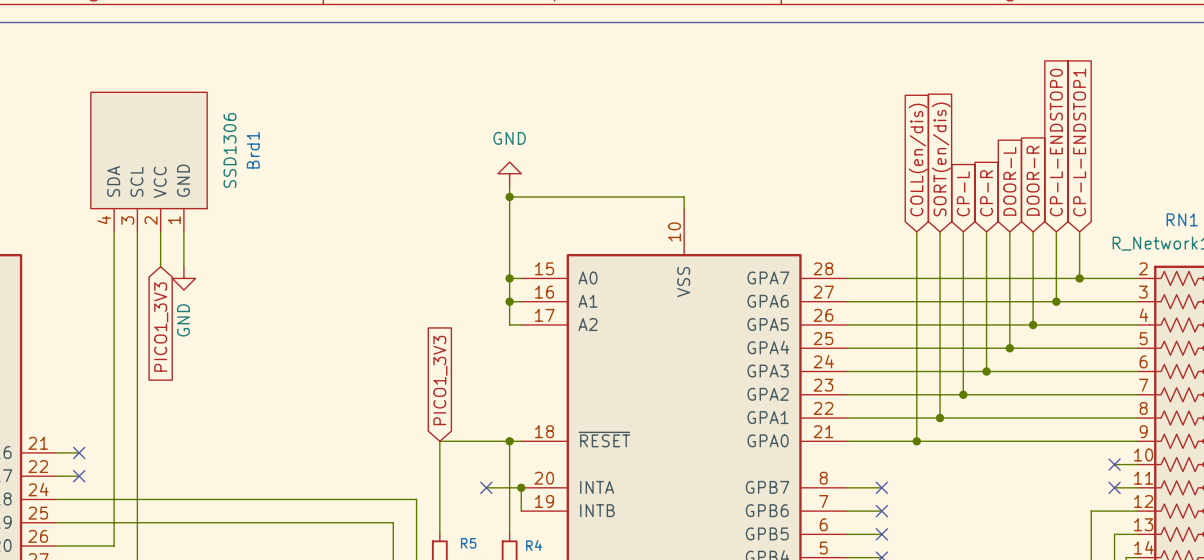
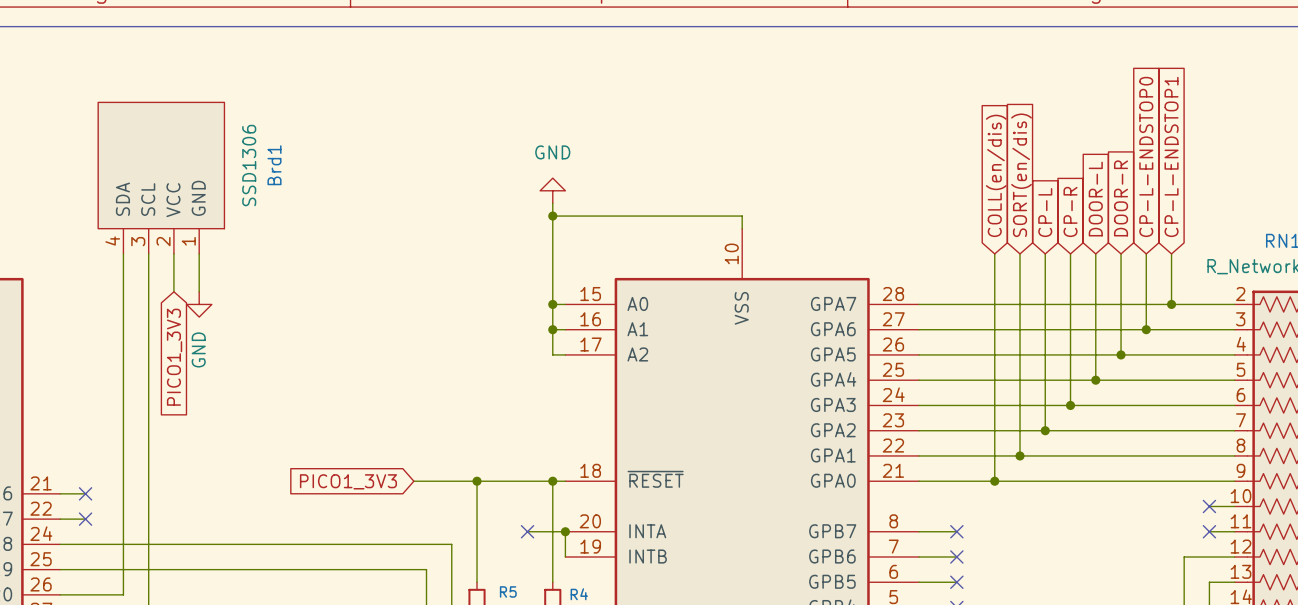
global label rotation: 0° (440, 380) -> 90° counterclockwise (348, 481)
global label position: PICO1_3V3 (440, 380) -> PICO1_3V3 (348, 481)
wire: none -> (413, 481) (477, 481)
junction: none -> (477, 481)

